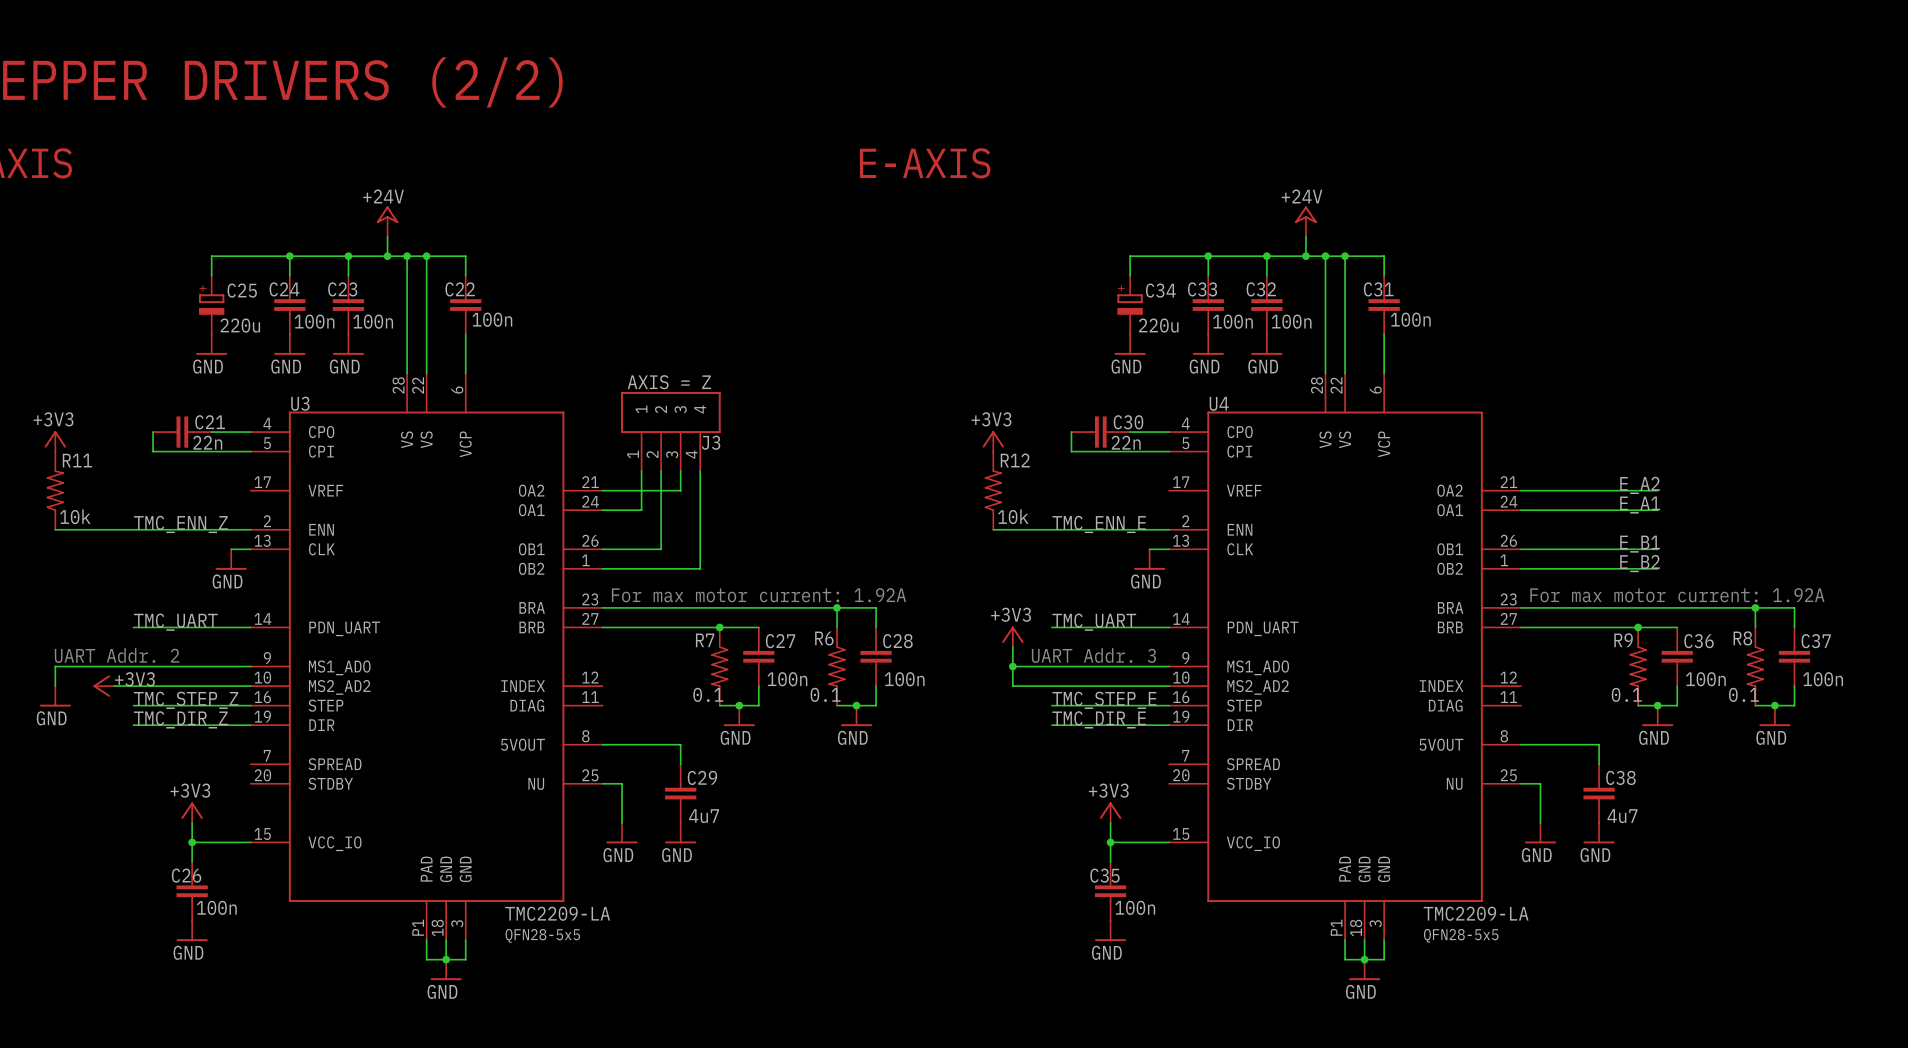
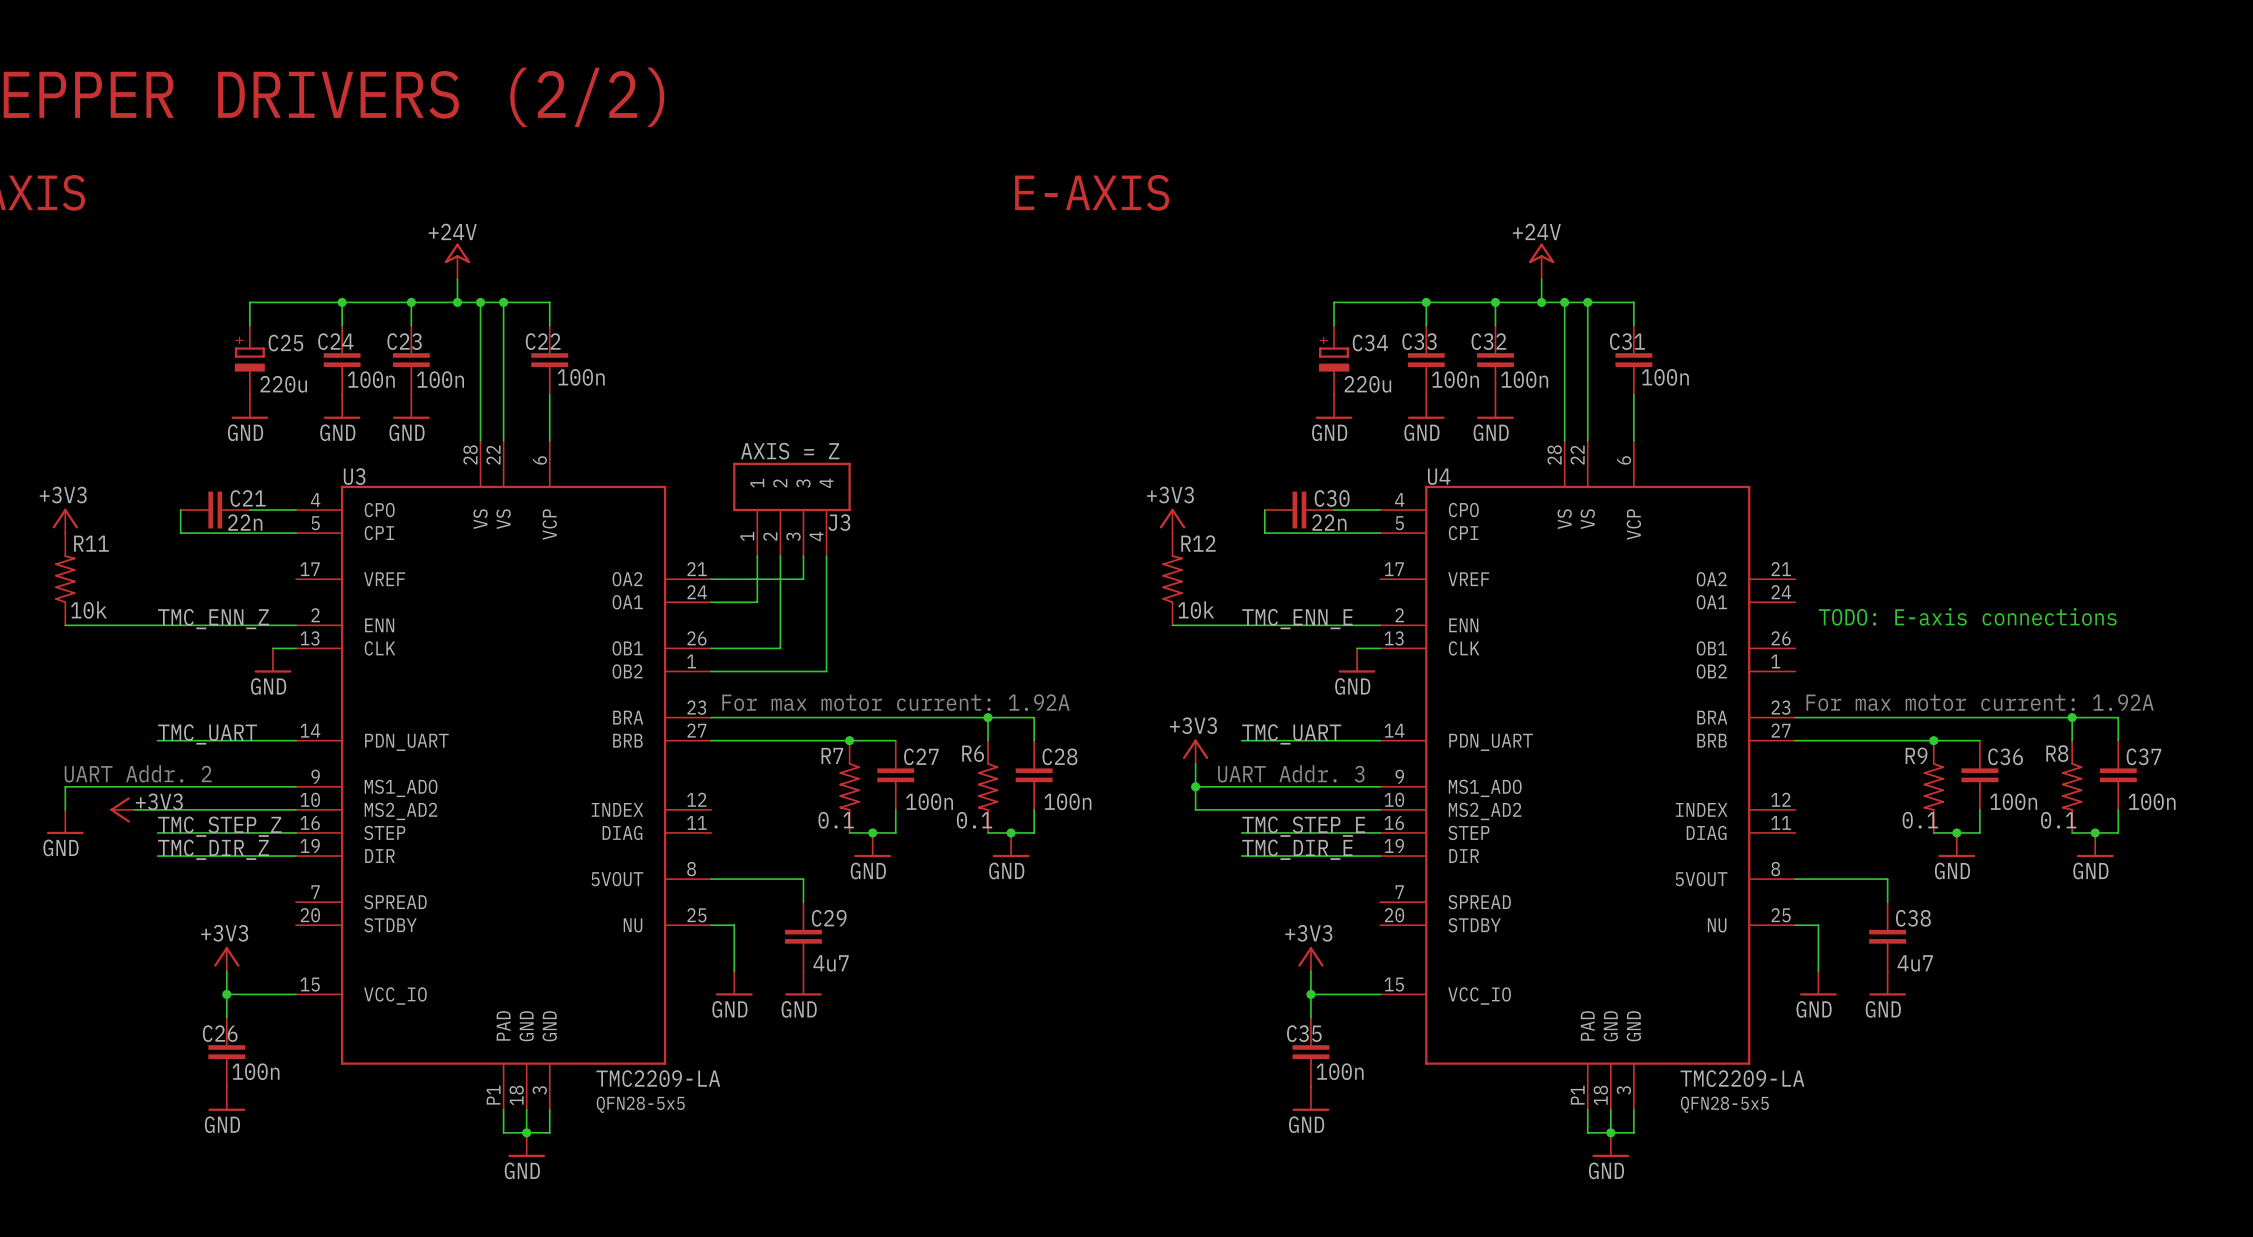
label: E_A2 (1640, 485) -> none
wire: (1520, 490) (1657, 490) -> none
label: E_A1 (1640, 505) -> none
wire: (1520, 510) (1657, 510) -> none
text: none -> TODO: E-axis connections (1967, 616)
label: E_B1 (1640, 544) -> none
wire: (1520, 549) (1657, 549) -> none
label: E_B2 (1640, 563) -> none
wire: (1520, 568) (1657, 568) -> none

